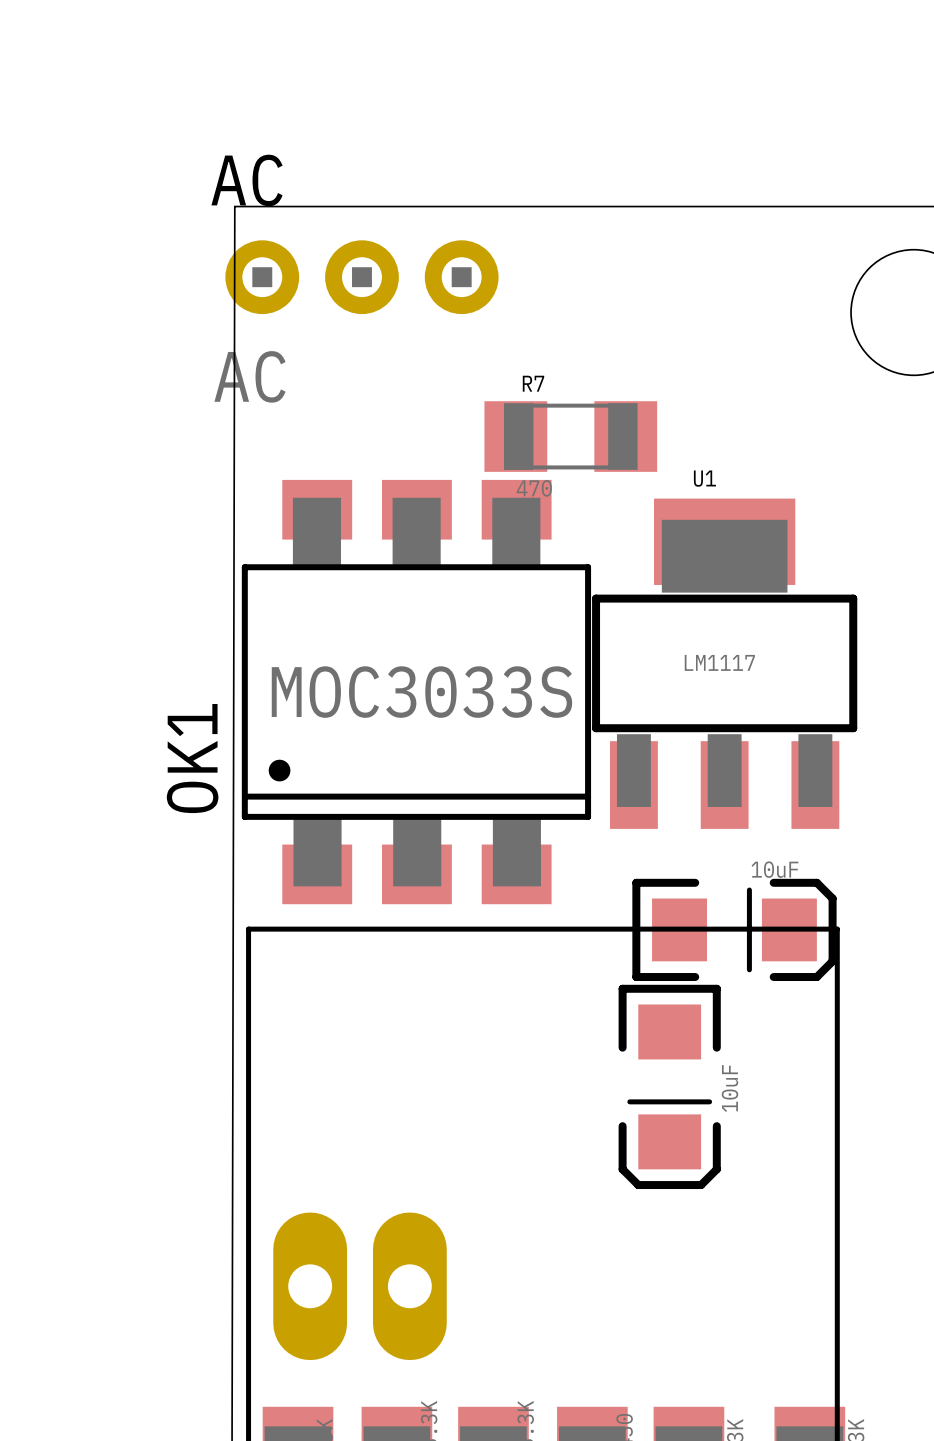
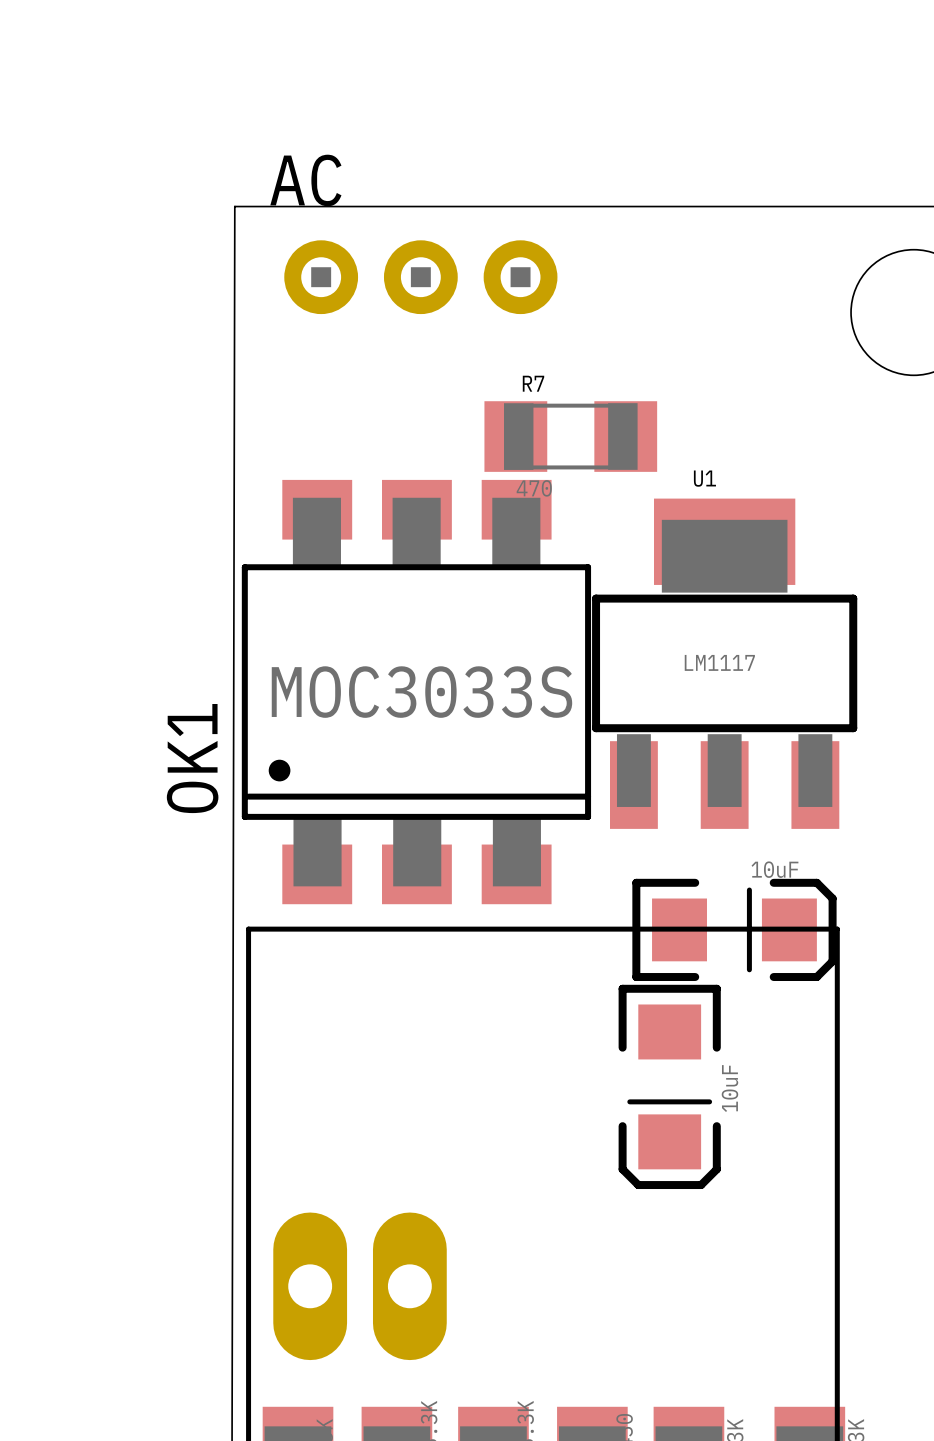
AC: AC (361, 277) -> none
AC: none -> (420, 277)

